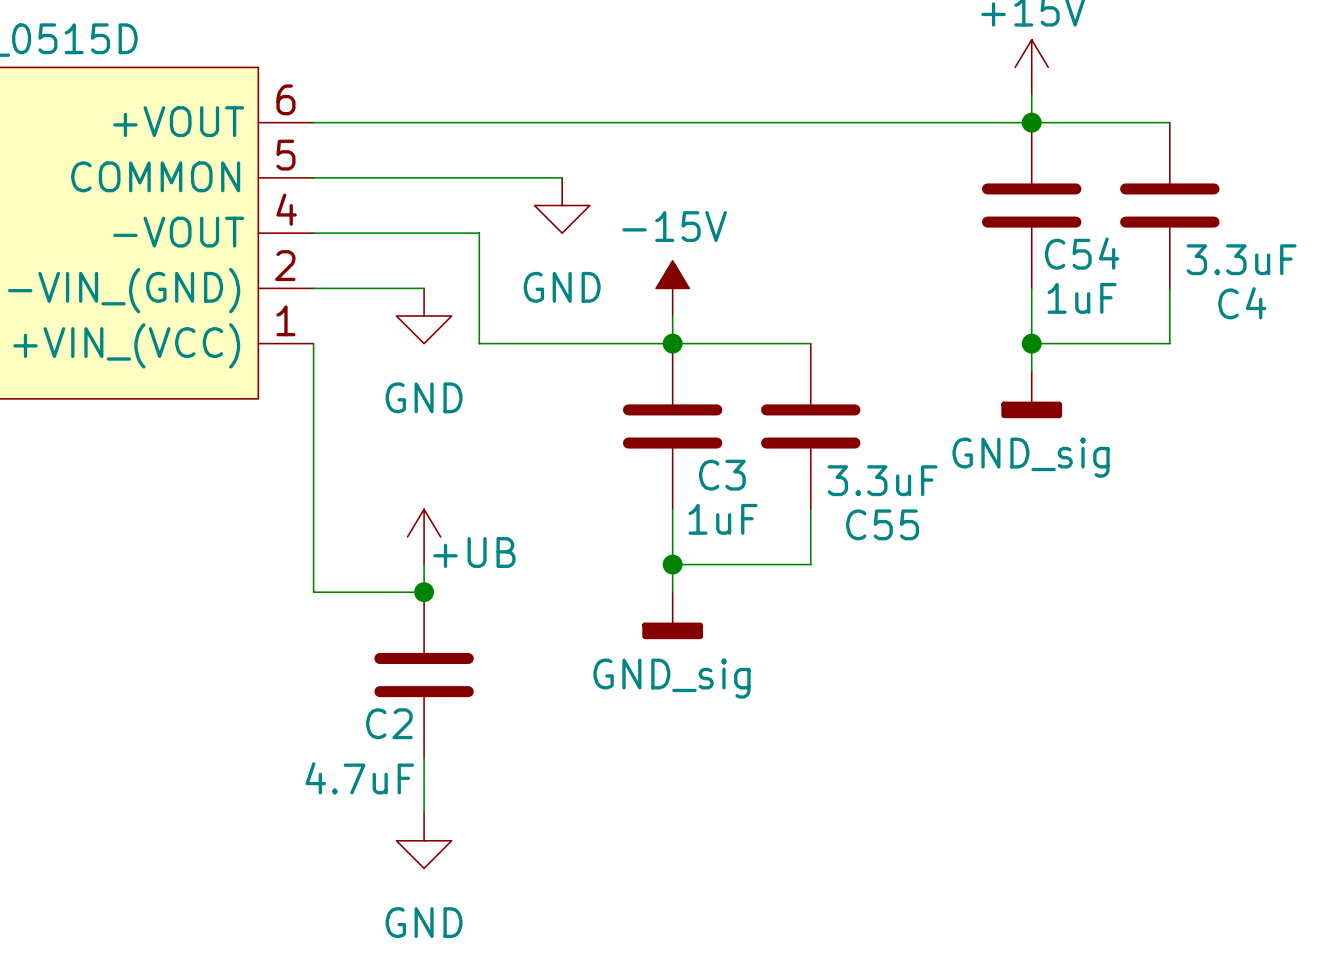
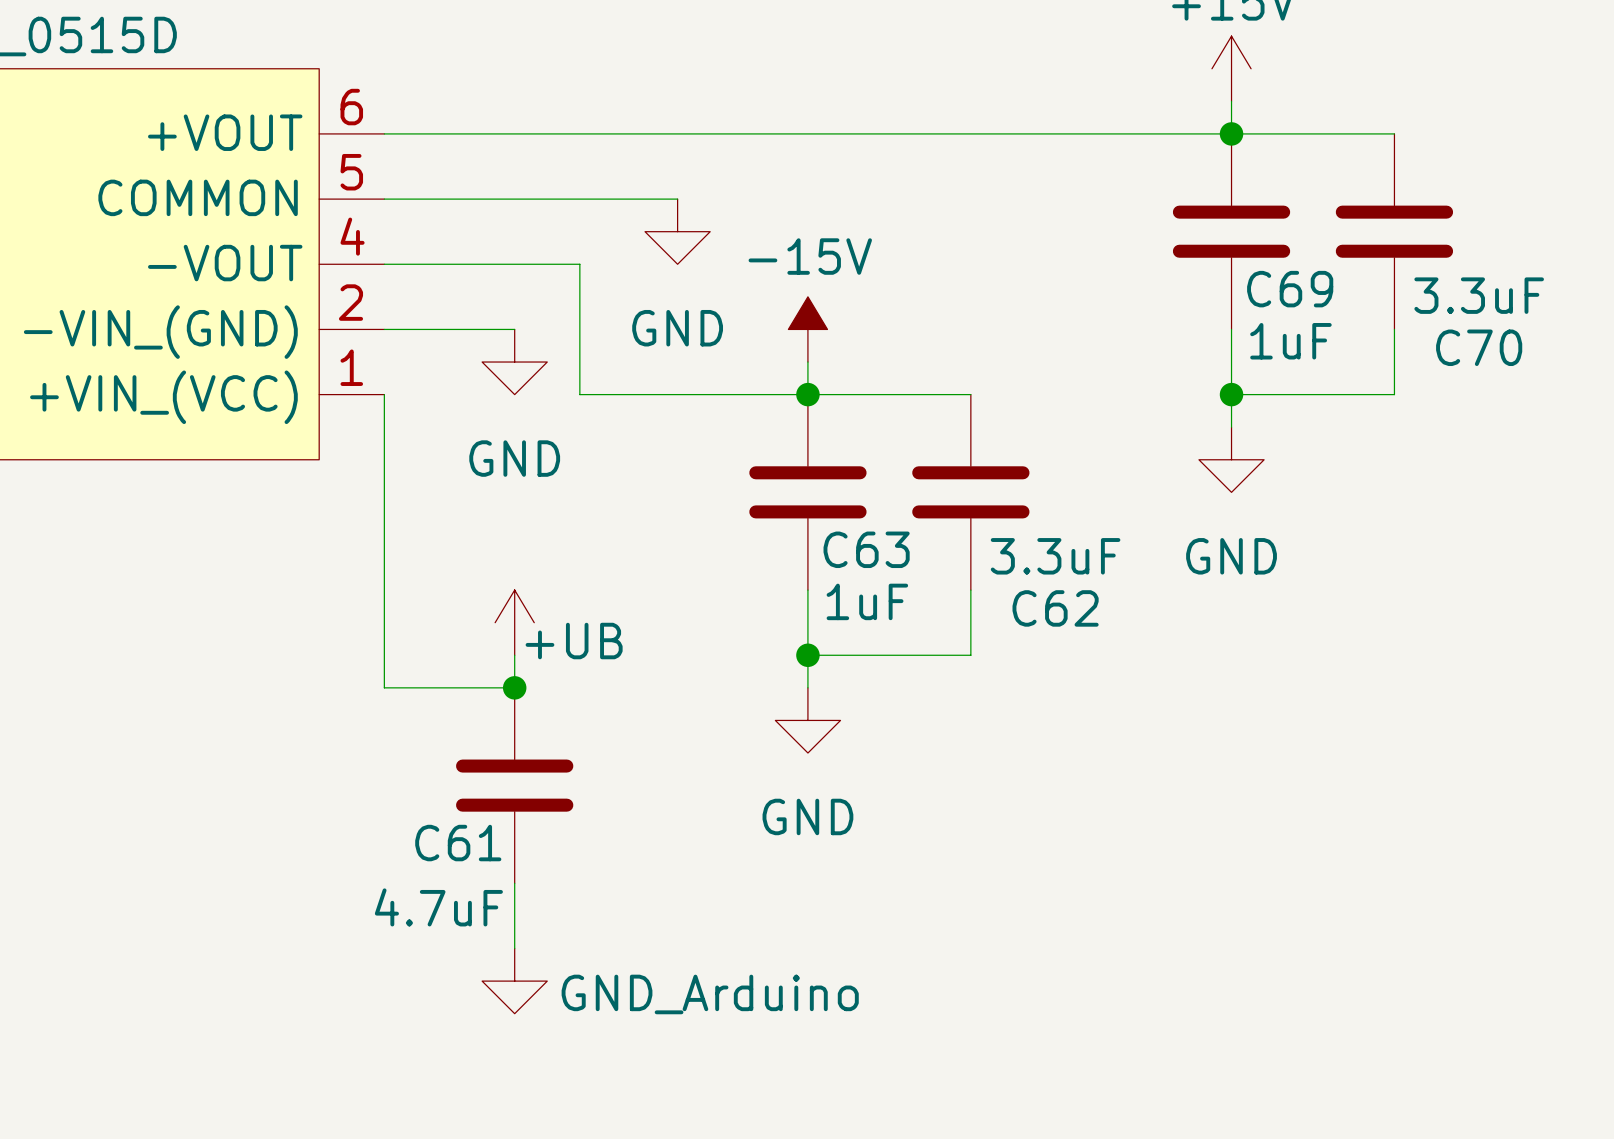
C54 name: C54 (1082, 253) -> C69 (1290, 289)
C4 name: C4 (1242, 303) -> C70 (1479, 347)
power symbol: GND_sig (1031, 394) -> GND (1231, 459)
C3 name: C3 (722, 475) -> C63 (866, 549)
C55 name: C55 (882, 524) -> C62 (1055, 608)
power symbol: GND_sig (672, 615) -> GND (807, 720)
C2 name: C2 (389, 723) -> C61 (458, 843)
power symbol: GND (424, 840) -> GND_Arduino (514, 981)

